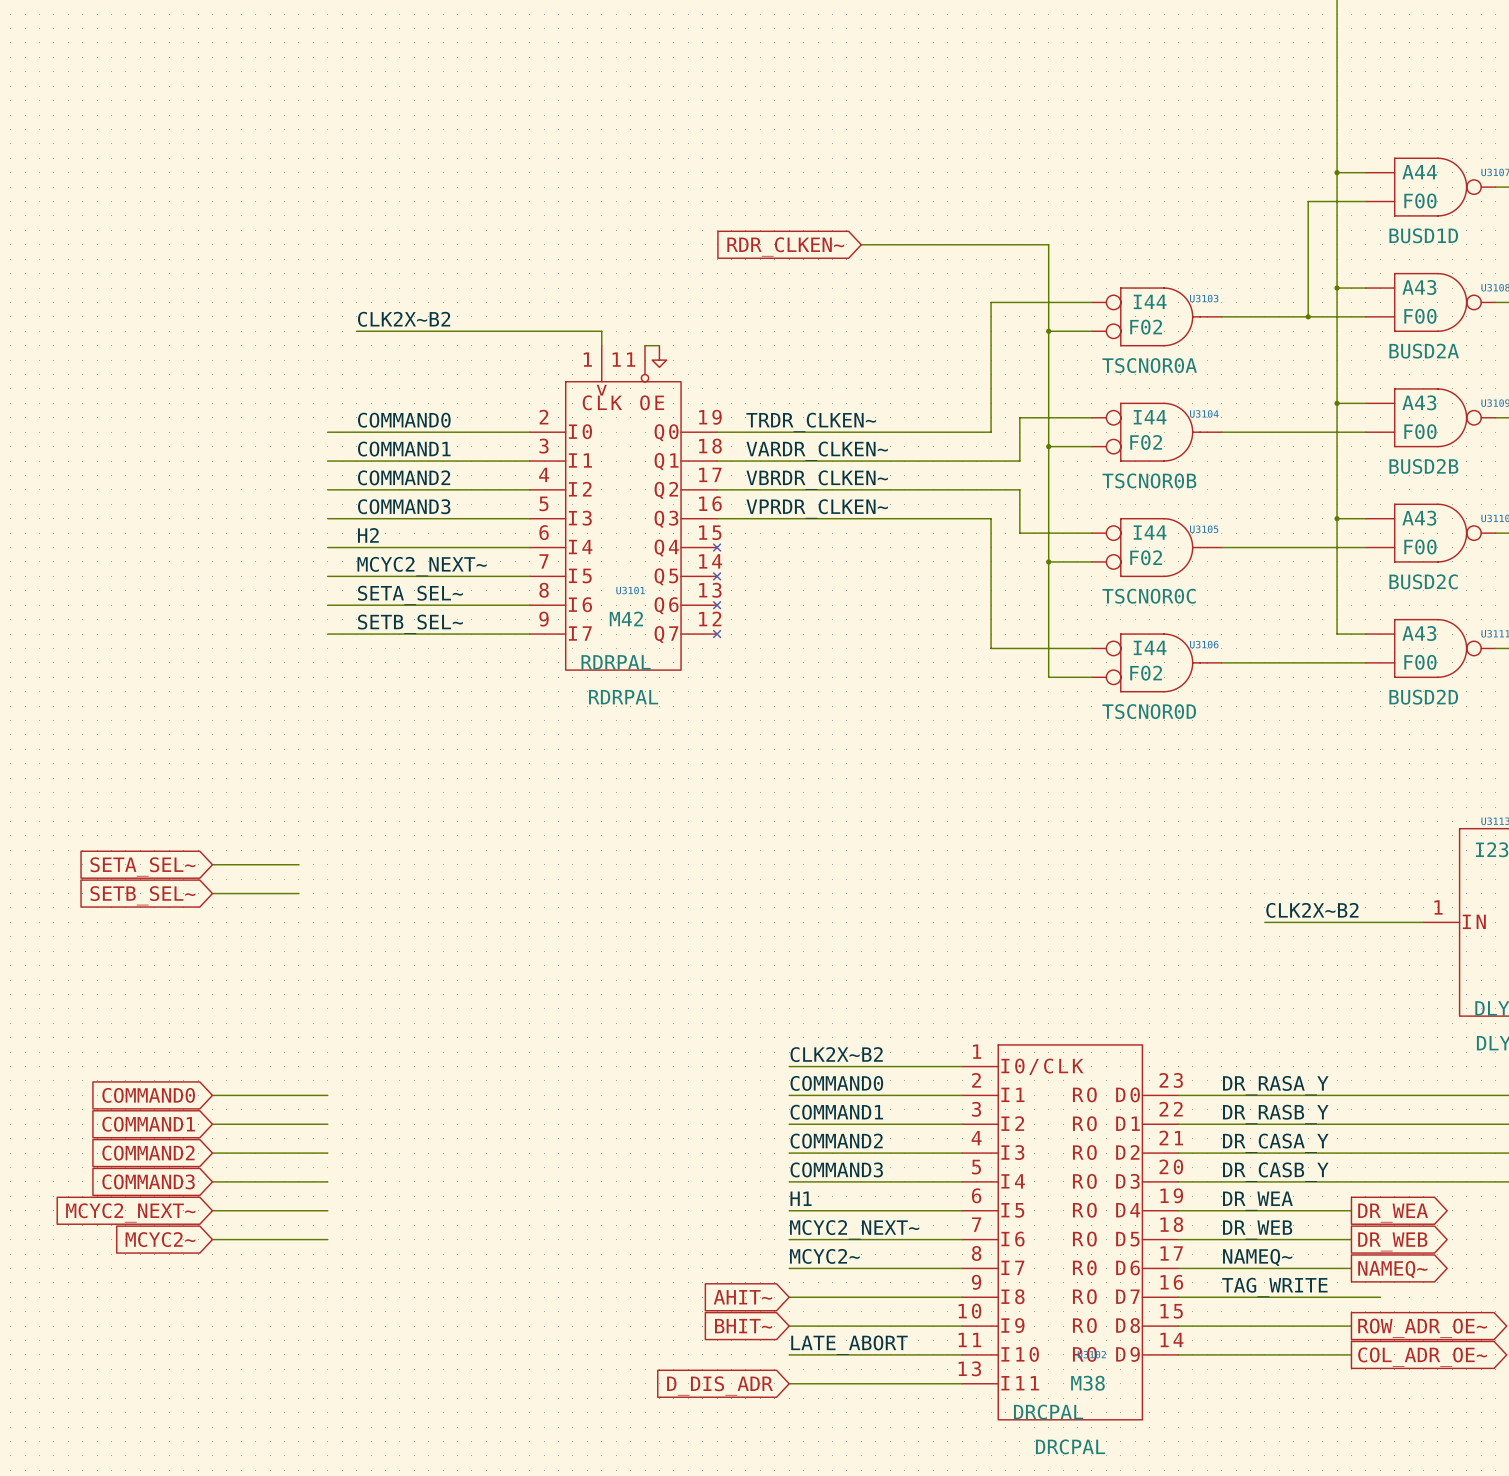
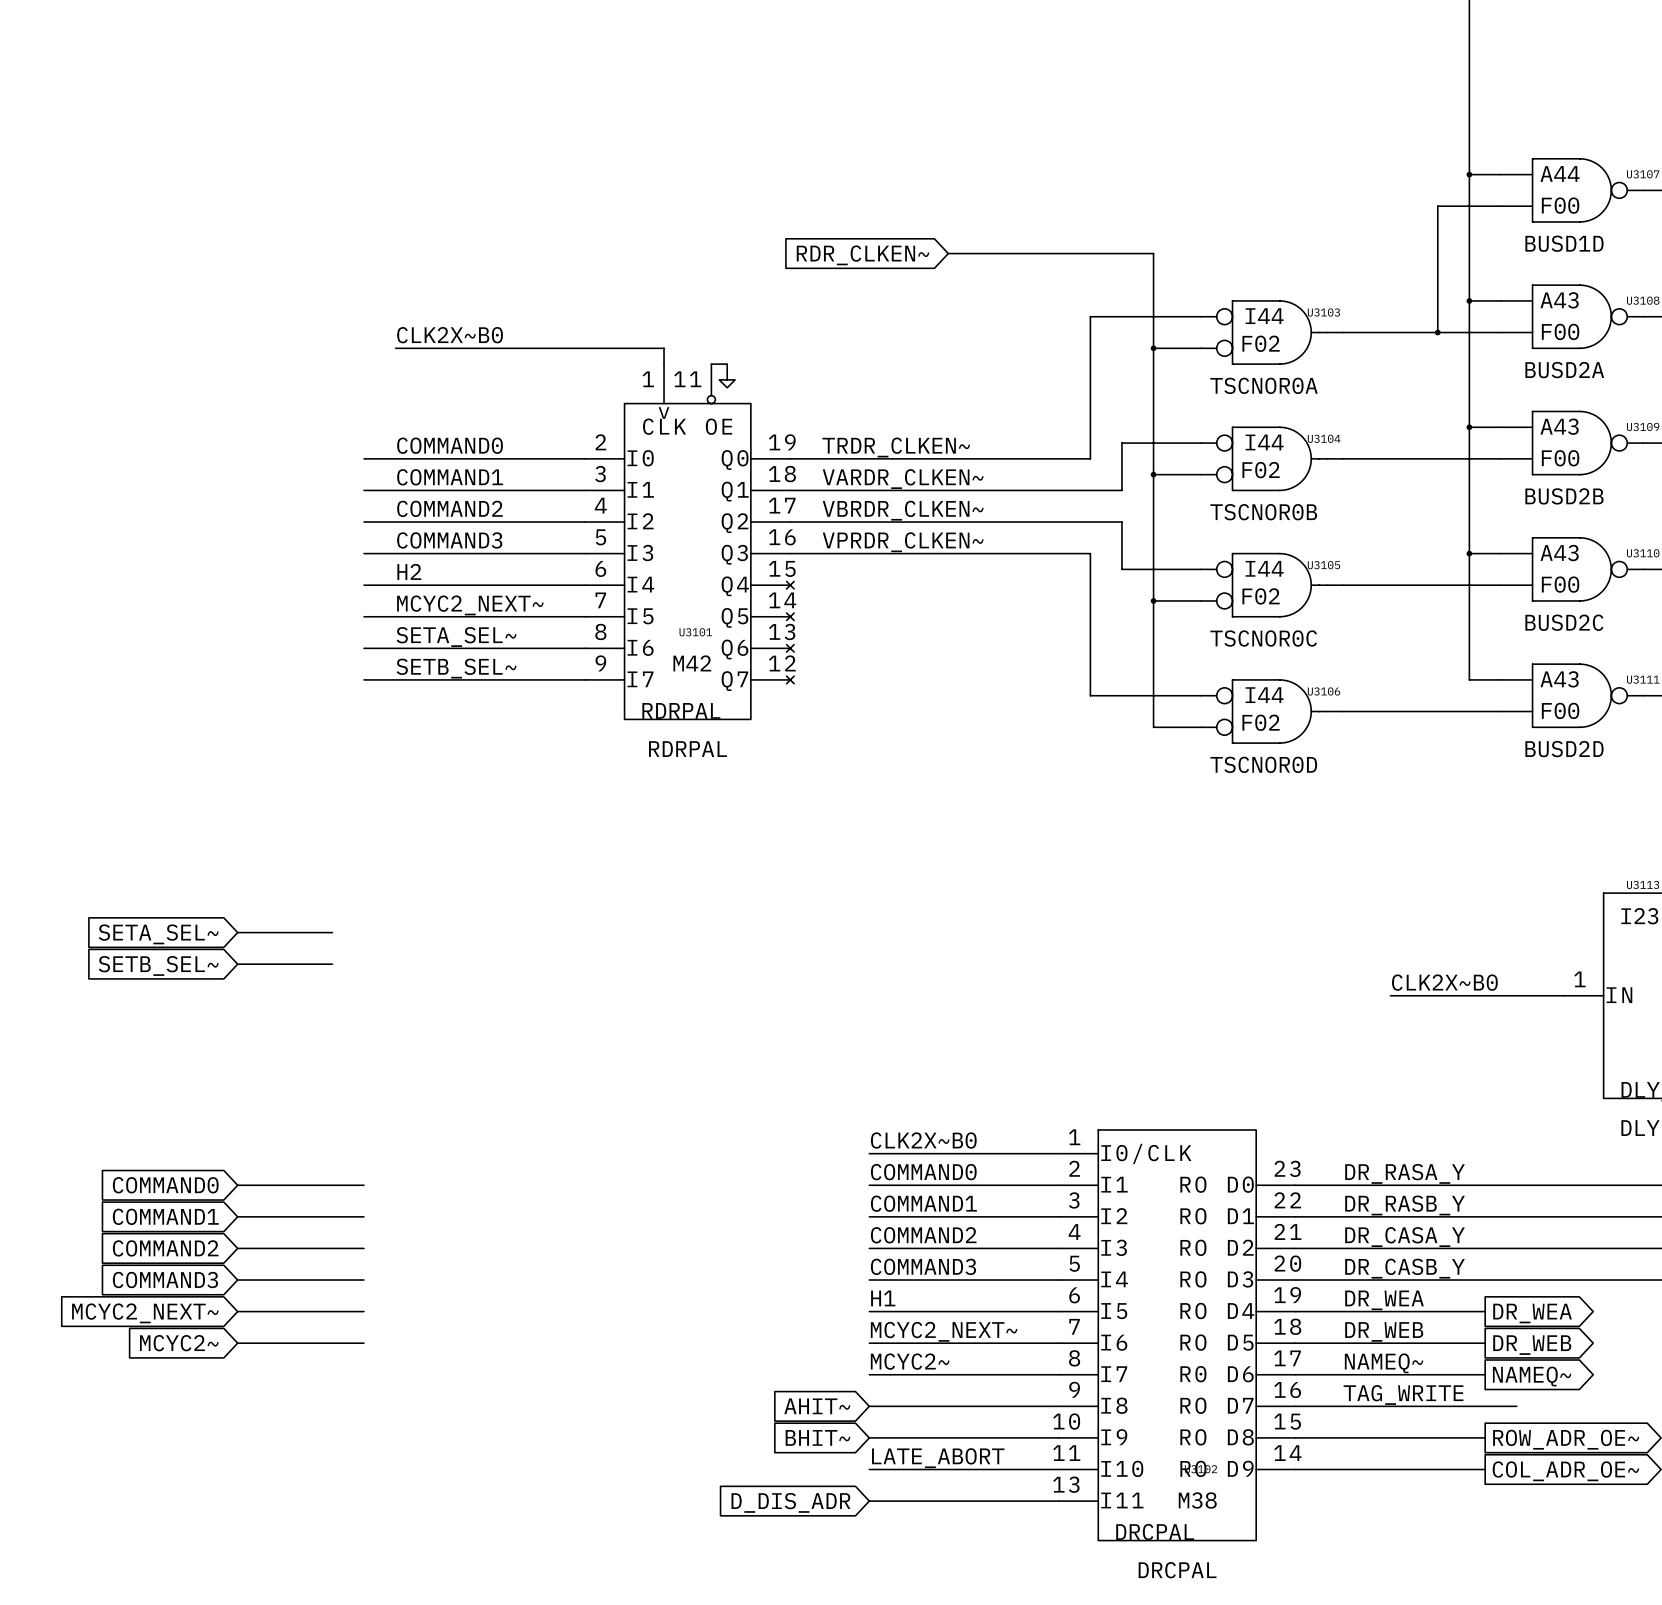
label: CLK2X~B2 (404, 319) -> CLK2X~B0 (450, 335)
label: CLK2X~B2 (1312, 910) -> CLK2X~B0 (1444, 982)
label: CLK2X~B2 (836, 1054) -> CLK2X~B0 (923, 1140)

